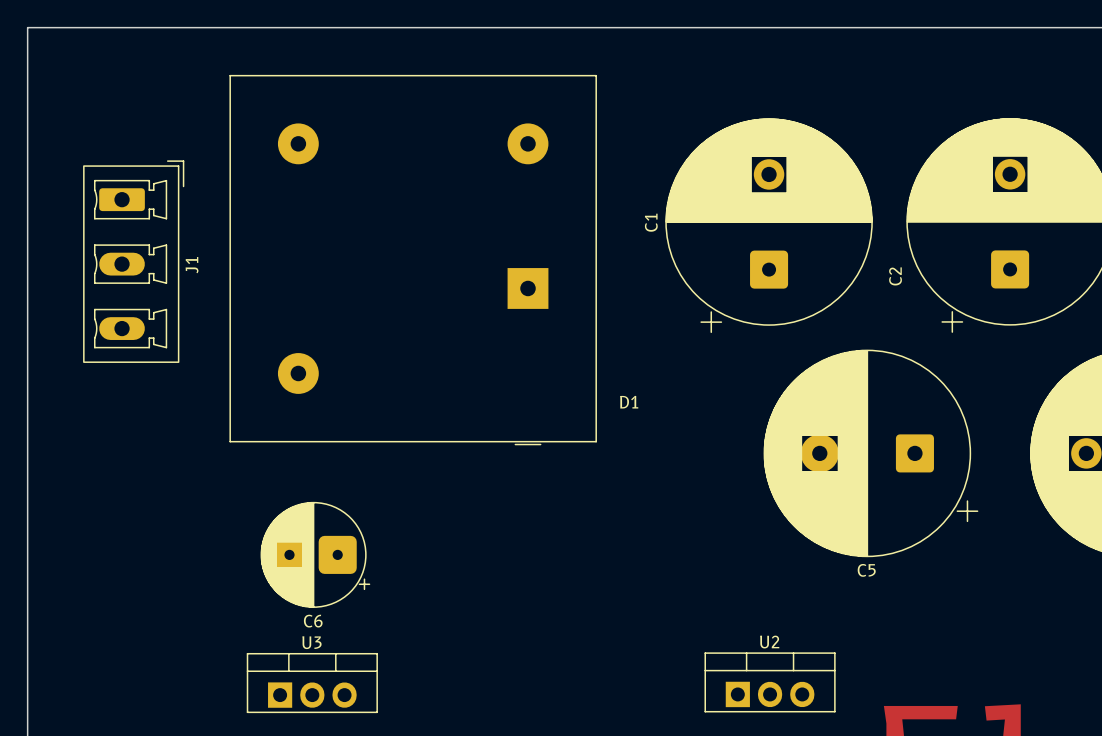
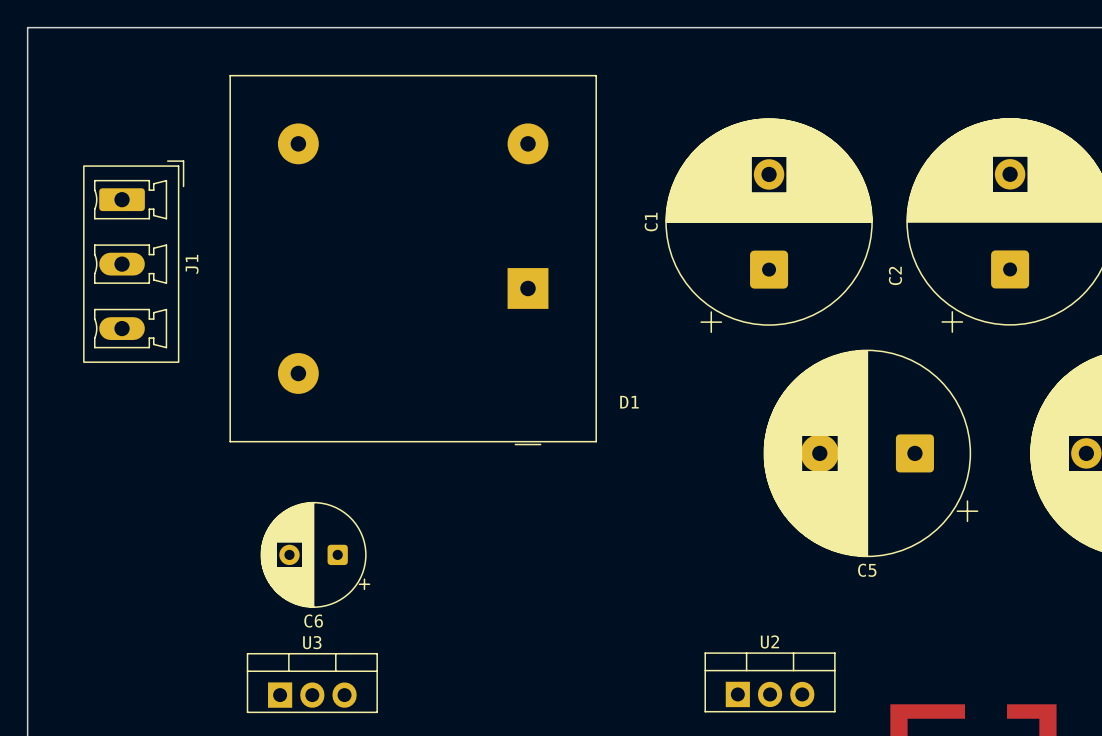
C6 footprint: [260, 501, 371, 608] -> [260, 501, 371, 608]

